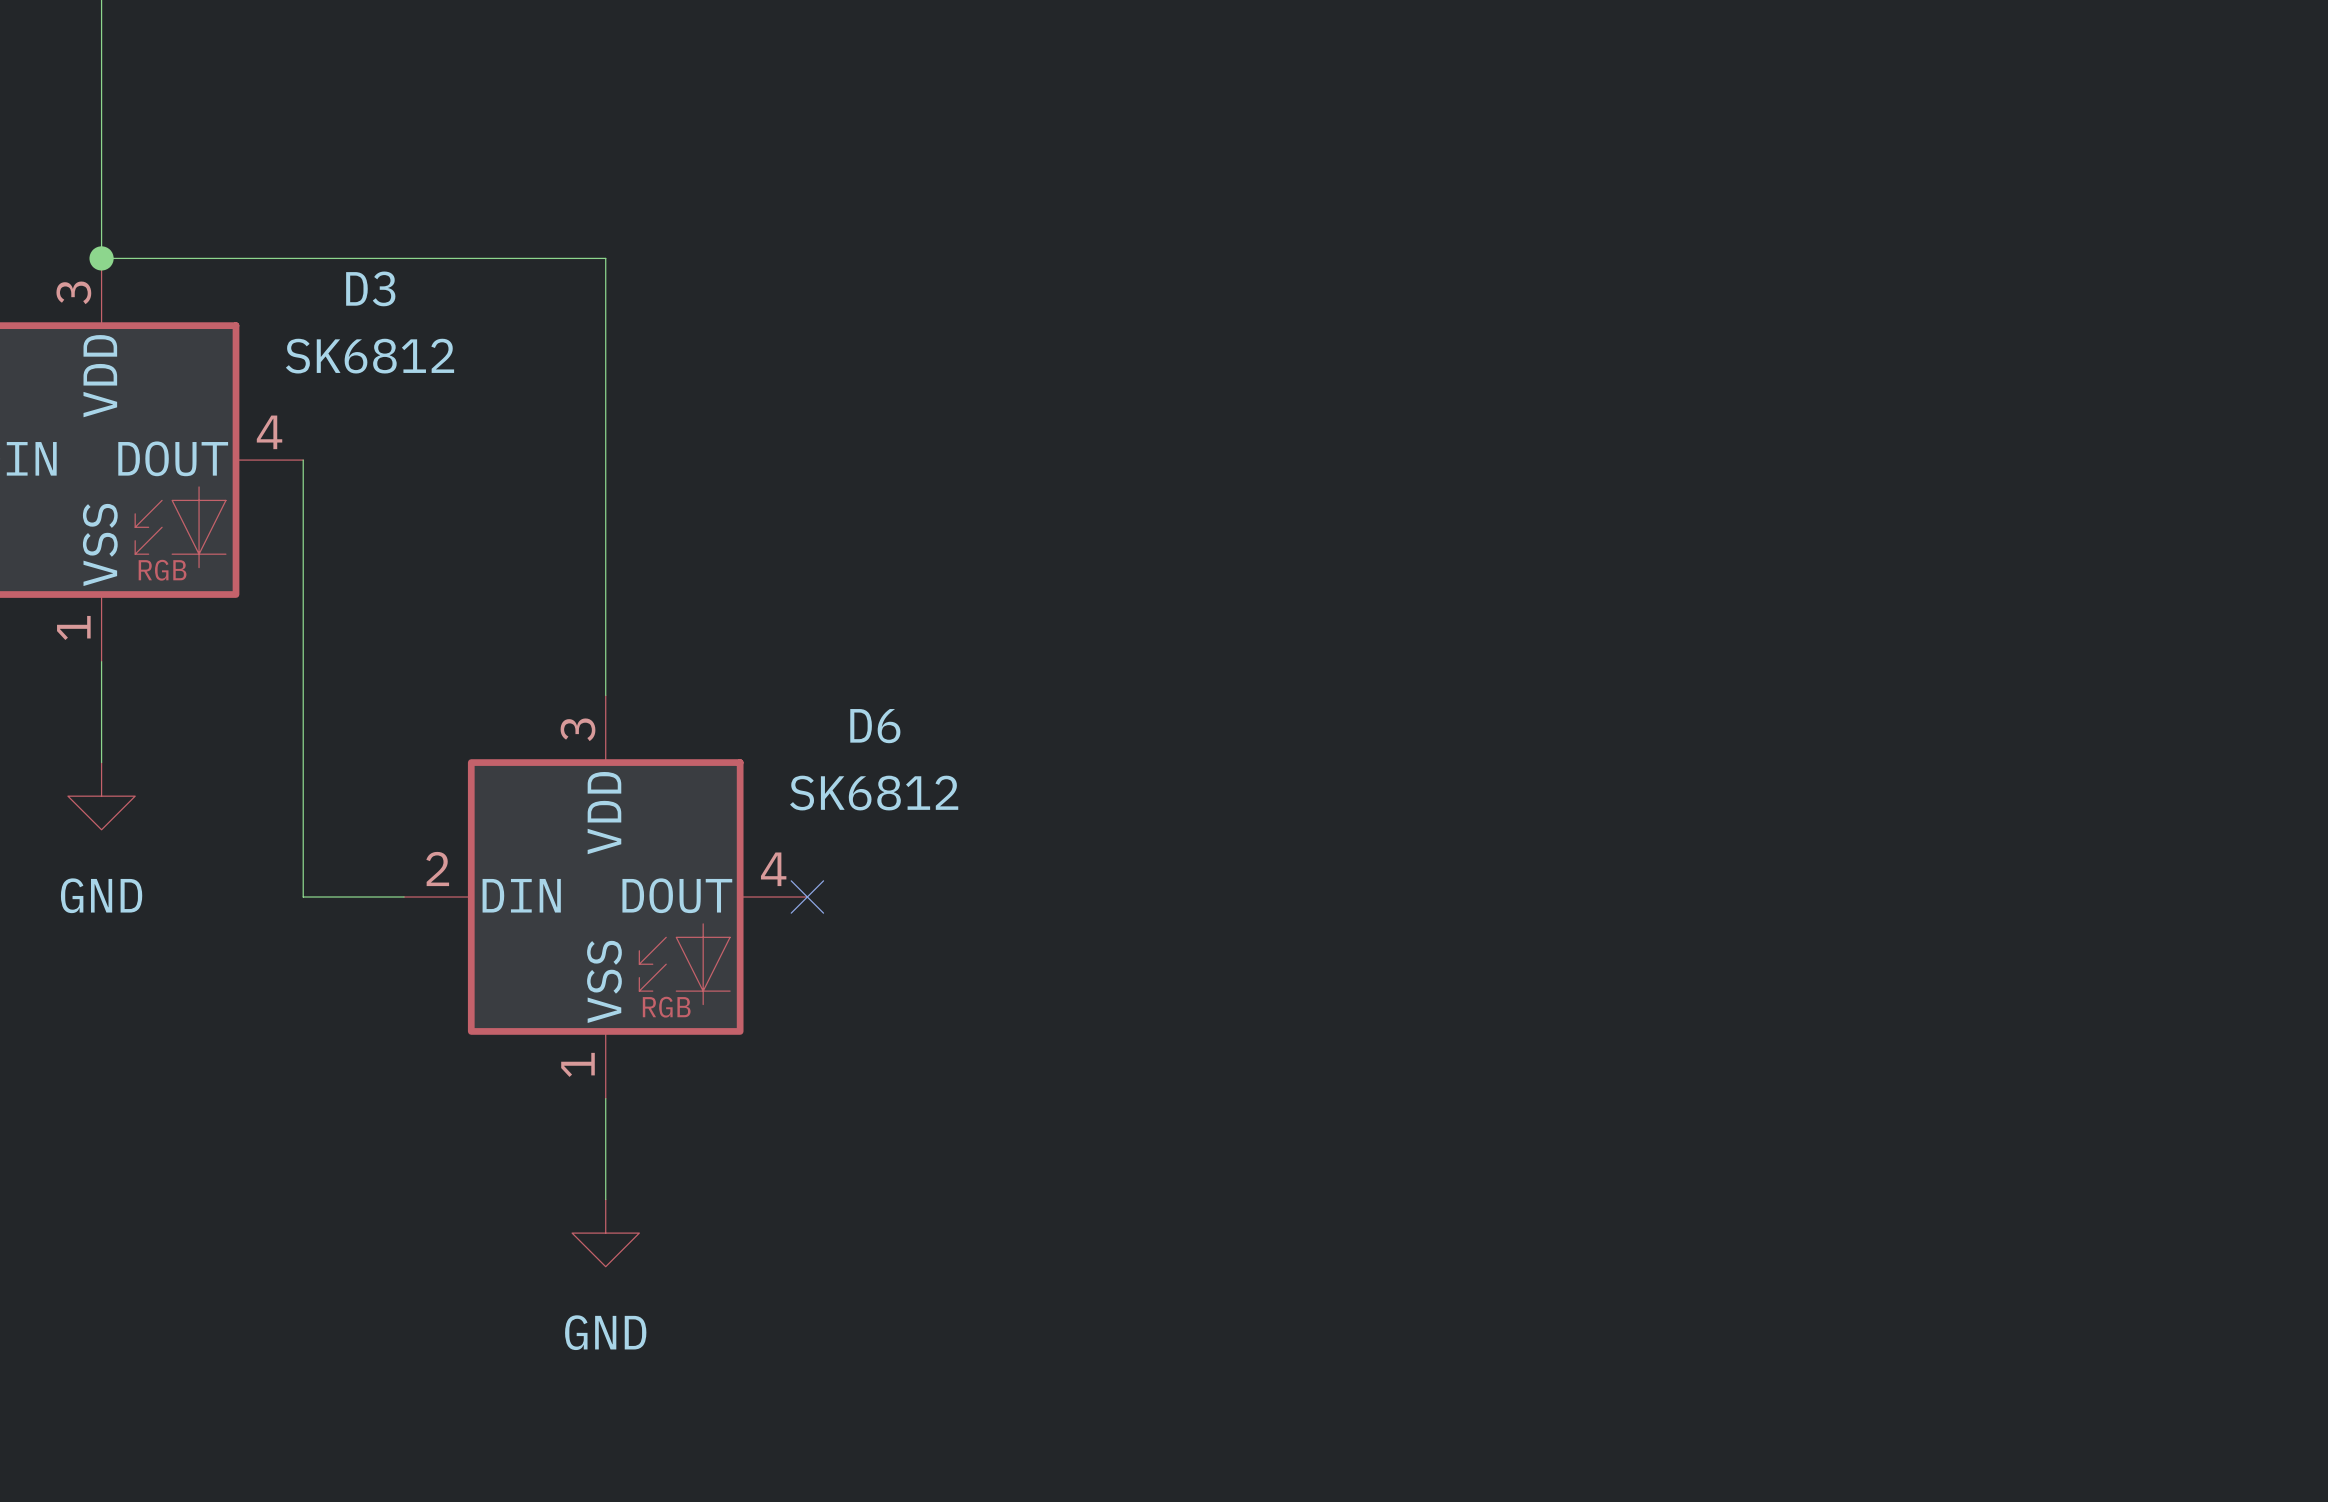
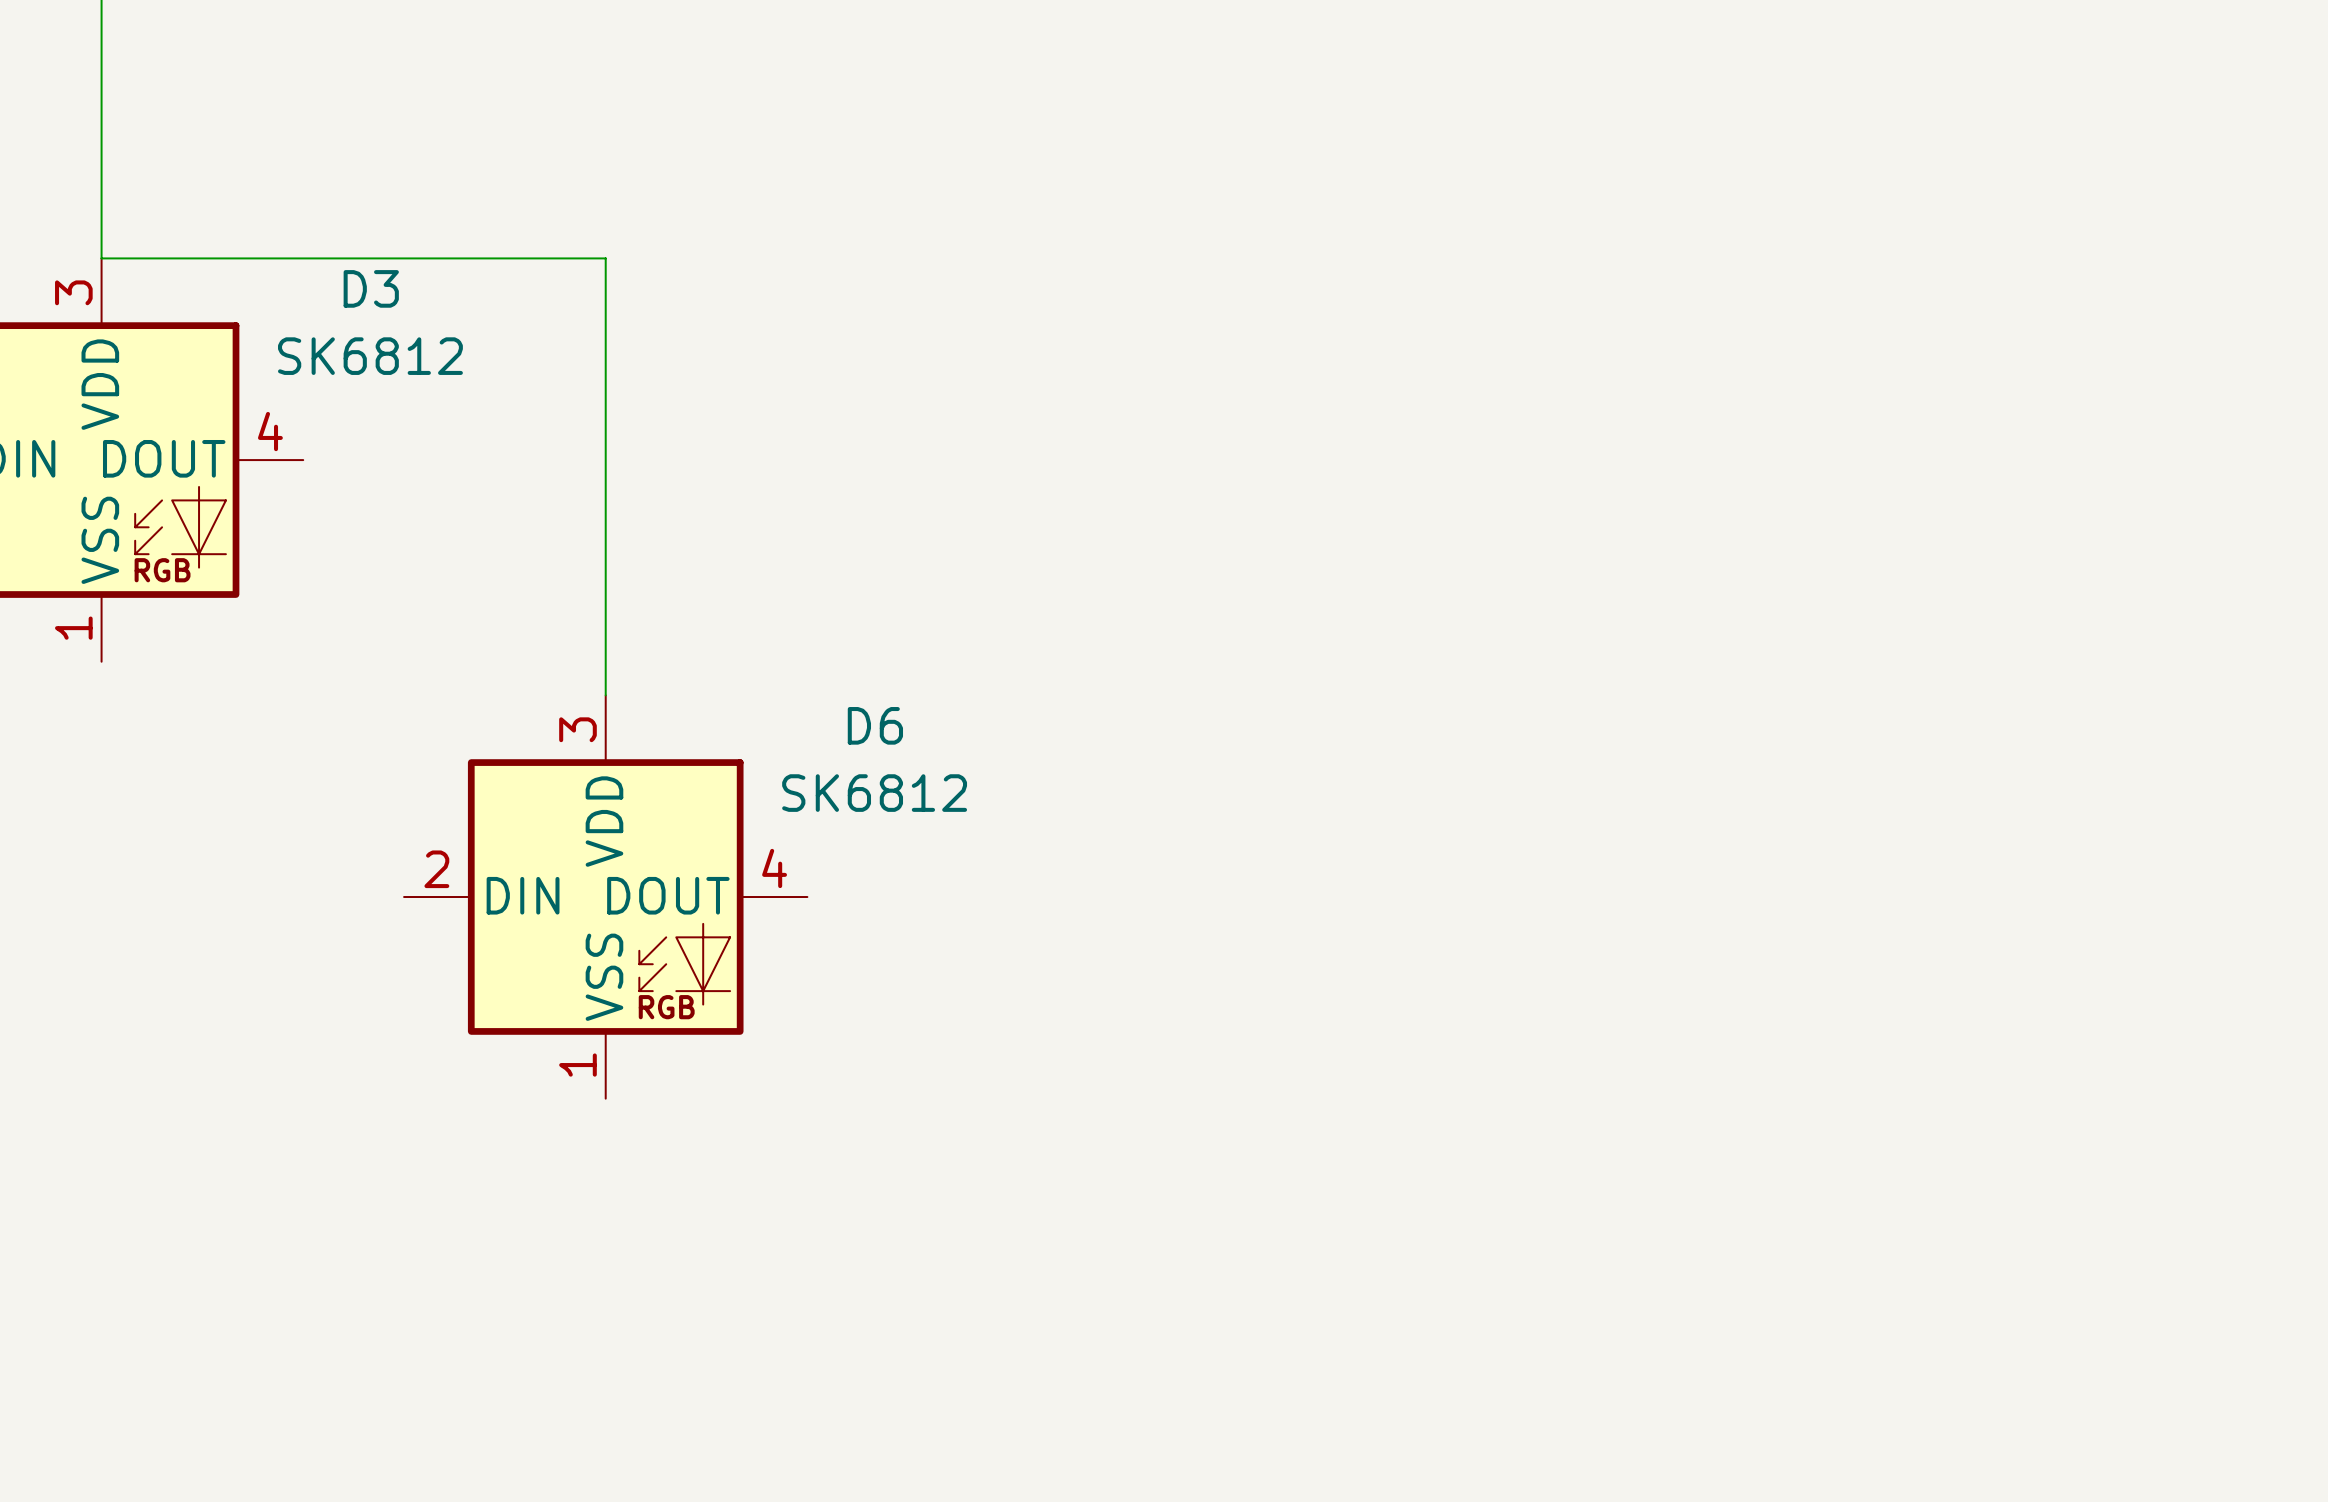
junction: (101, 258) -> none
wire: (303, 460) (303, 897) (404, 897) -> none
wire: (101, 661) (101, 762) -> none
power symbol: GND (101, 796) -> none
no-connect mark: (807, 897) -> none
wire: (605, 1098) (605, 1199) -> none
power symbol: GND (605, 1233) -> none

